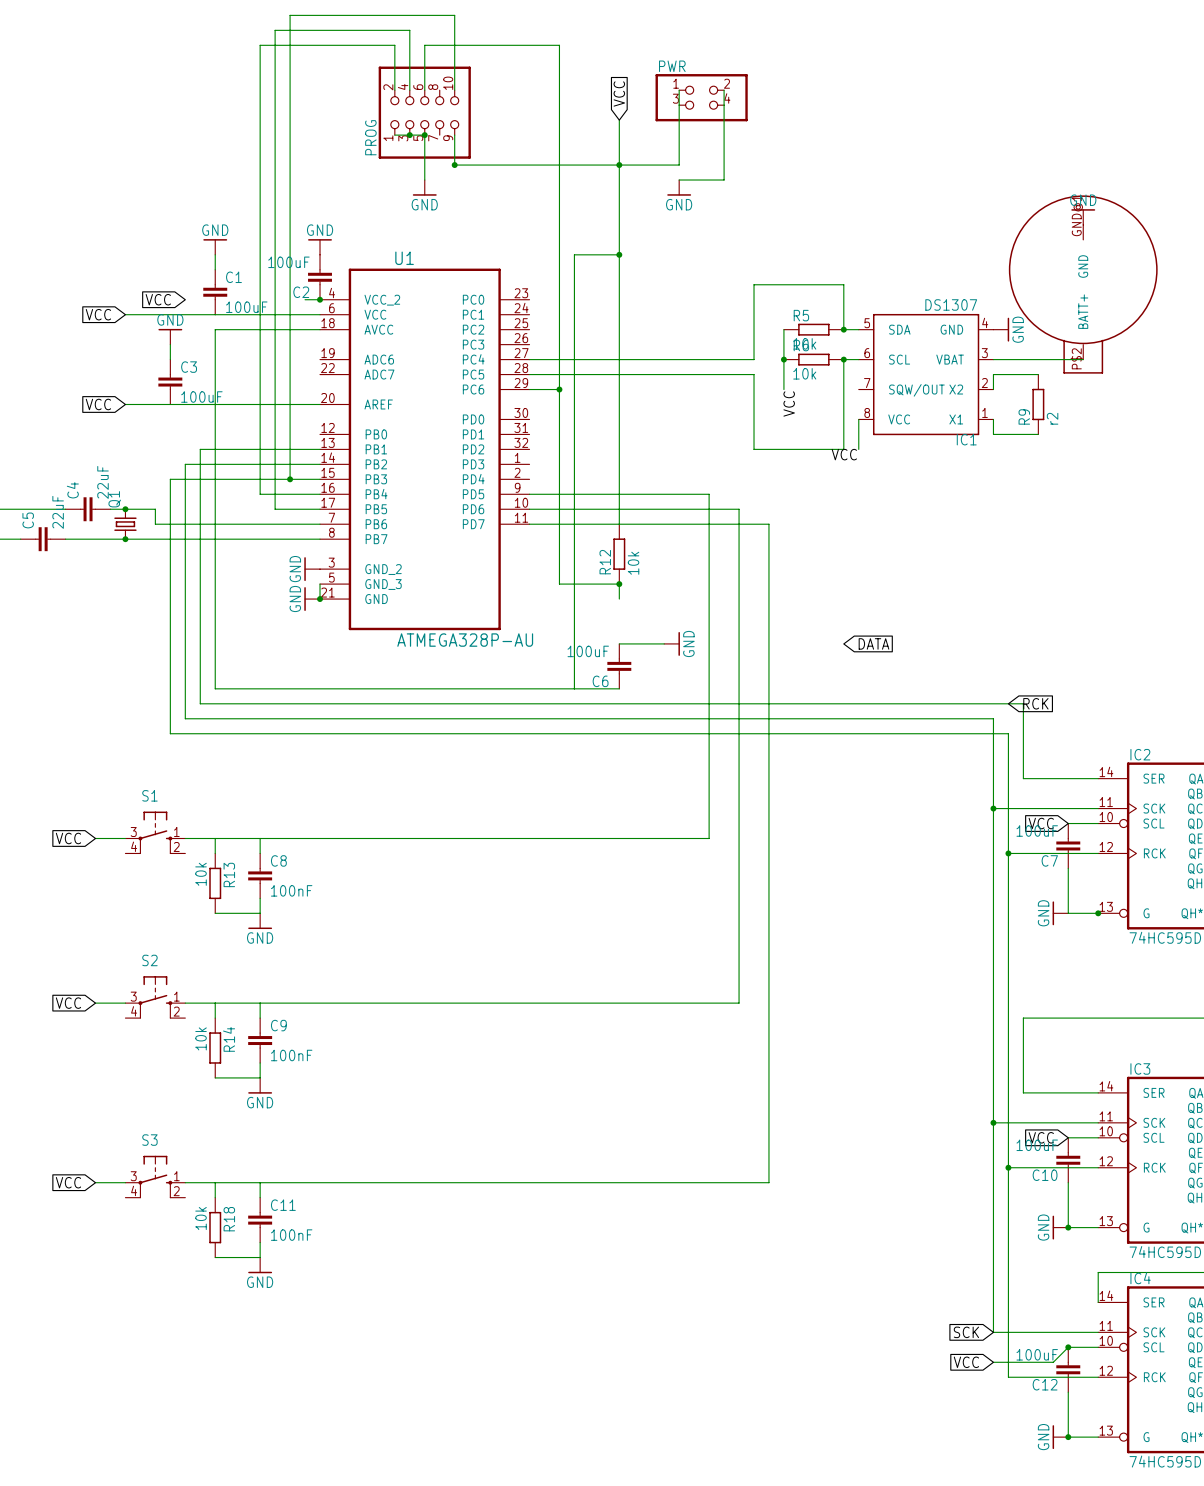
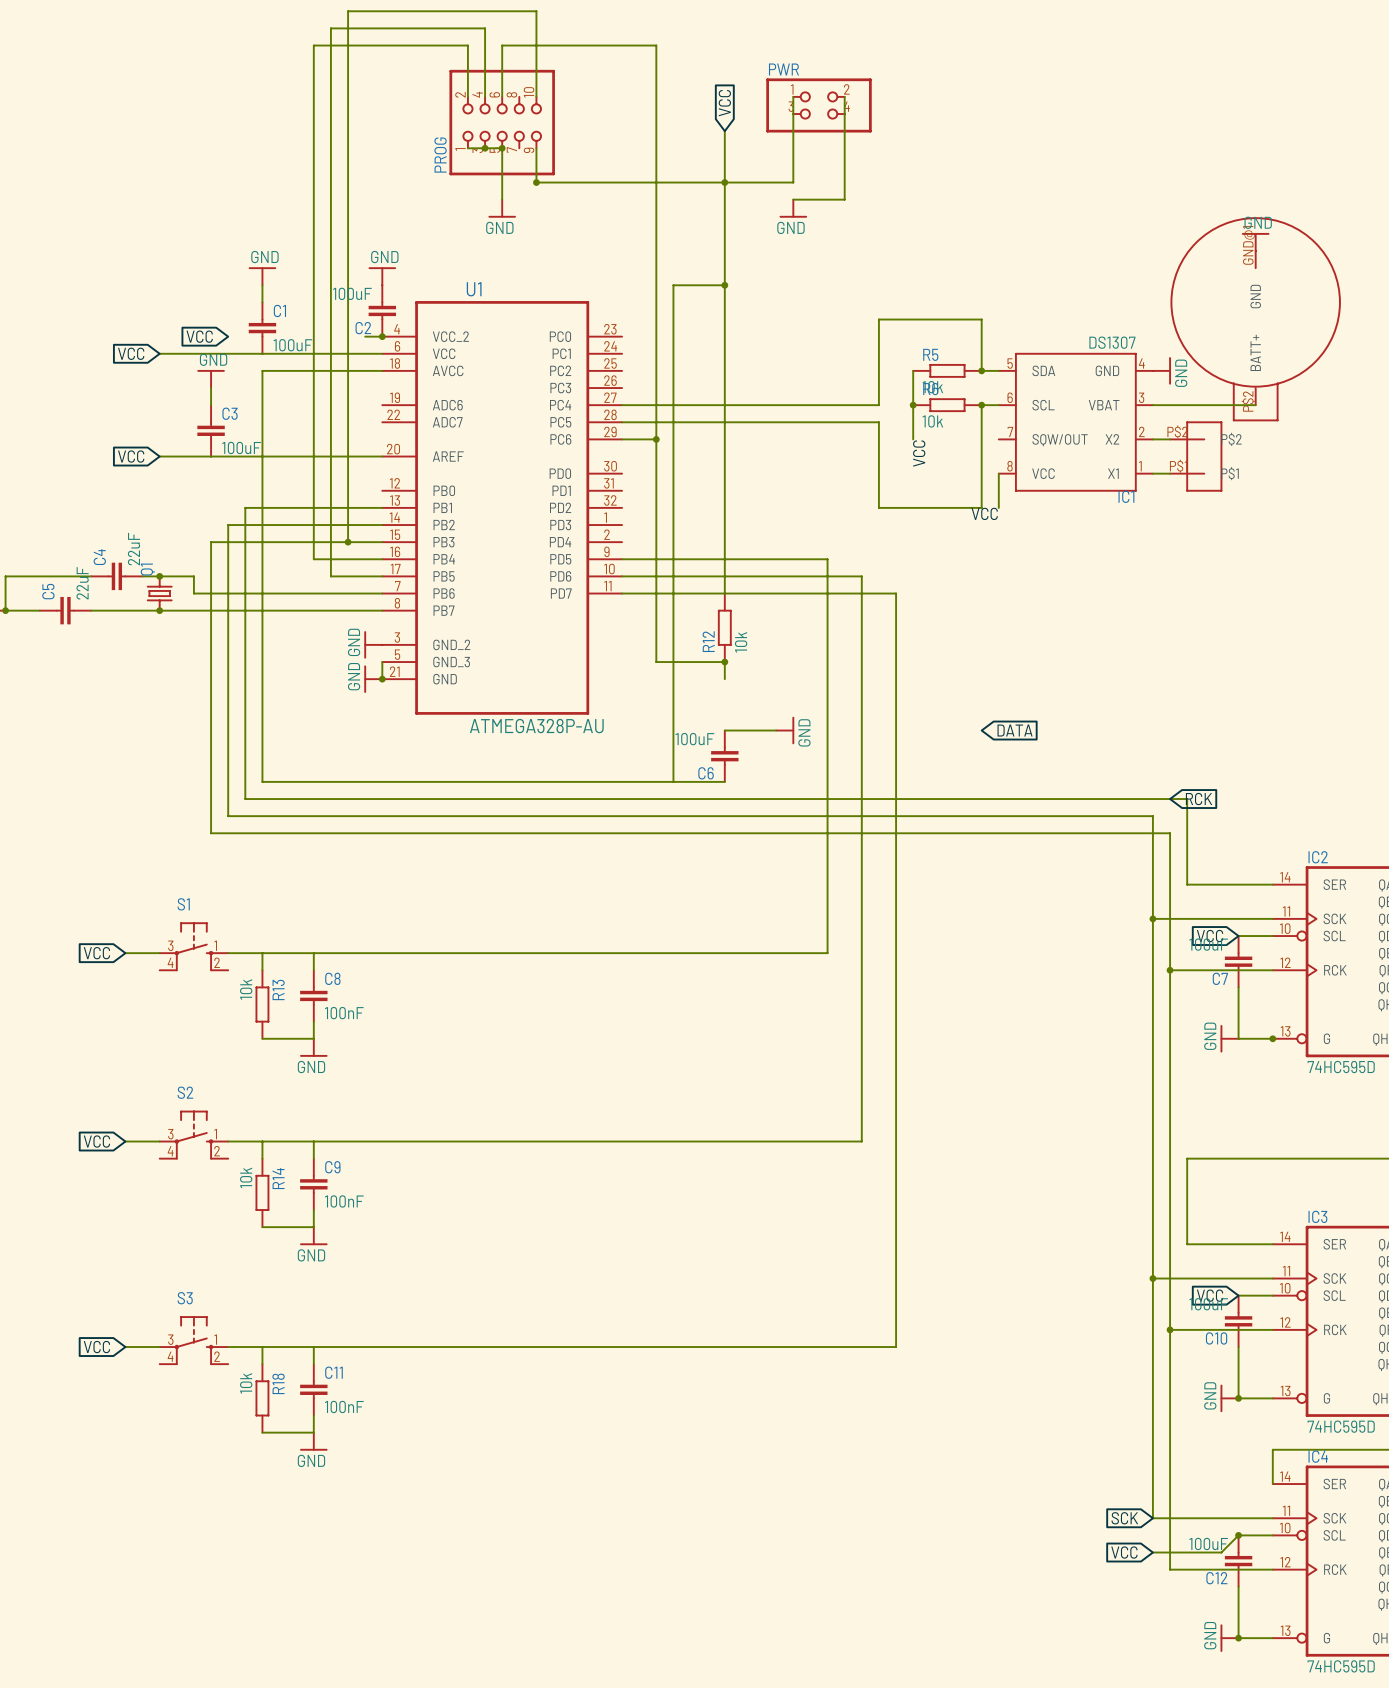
wire: (1038, 374) (993, 374) (993, 389) -> (1170, 439) (1152, 439)
part: none -> (1196, 456)
R9: r2 (1038, 404) -> none
wire: (993, 419) (993, 434) (1038, 434) -> (1152, 473) (1170, 473)

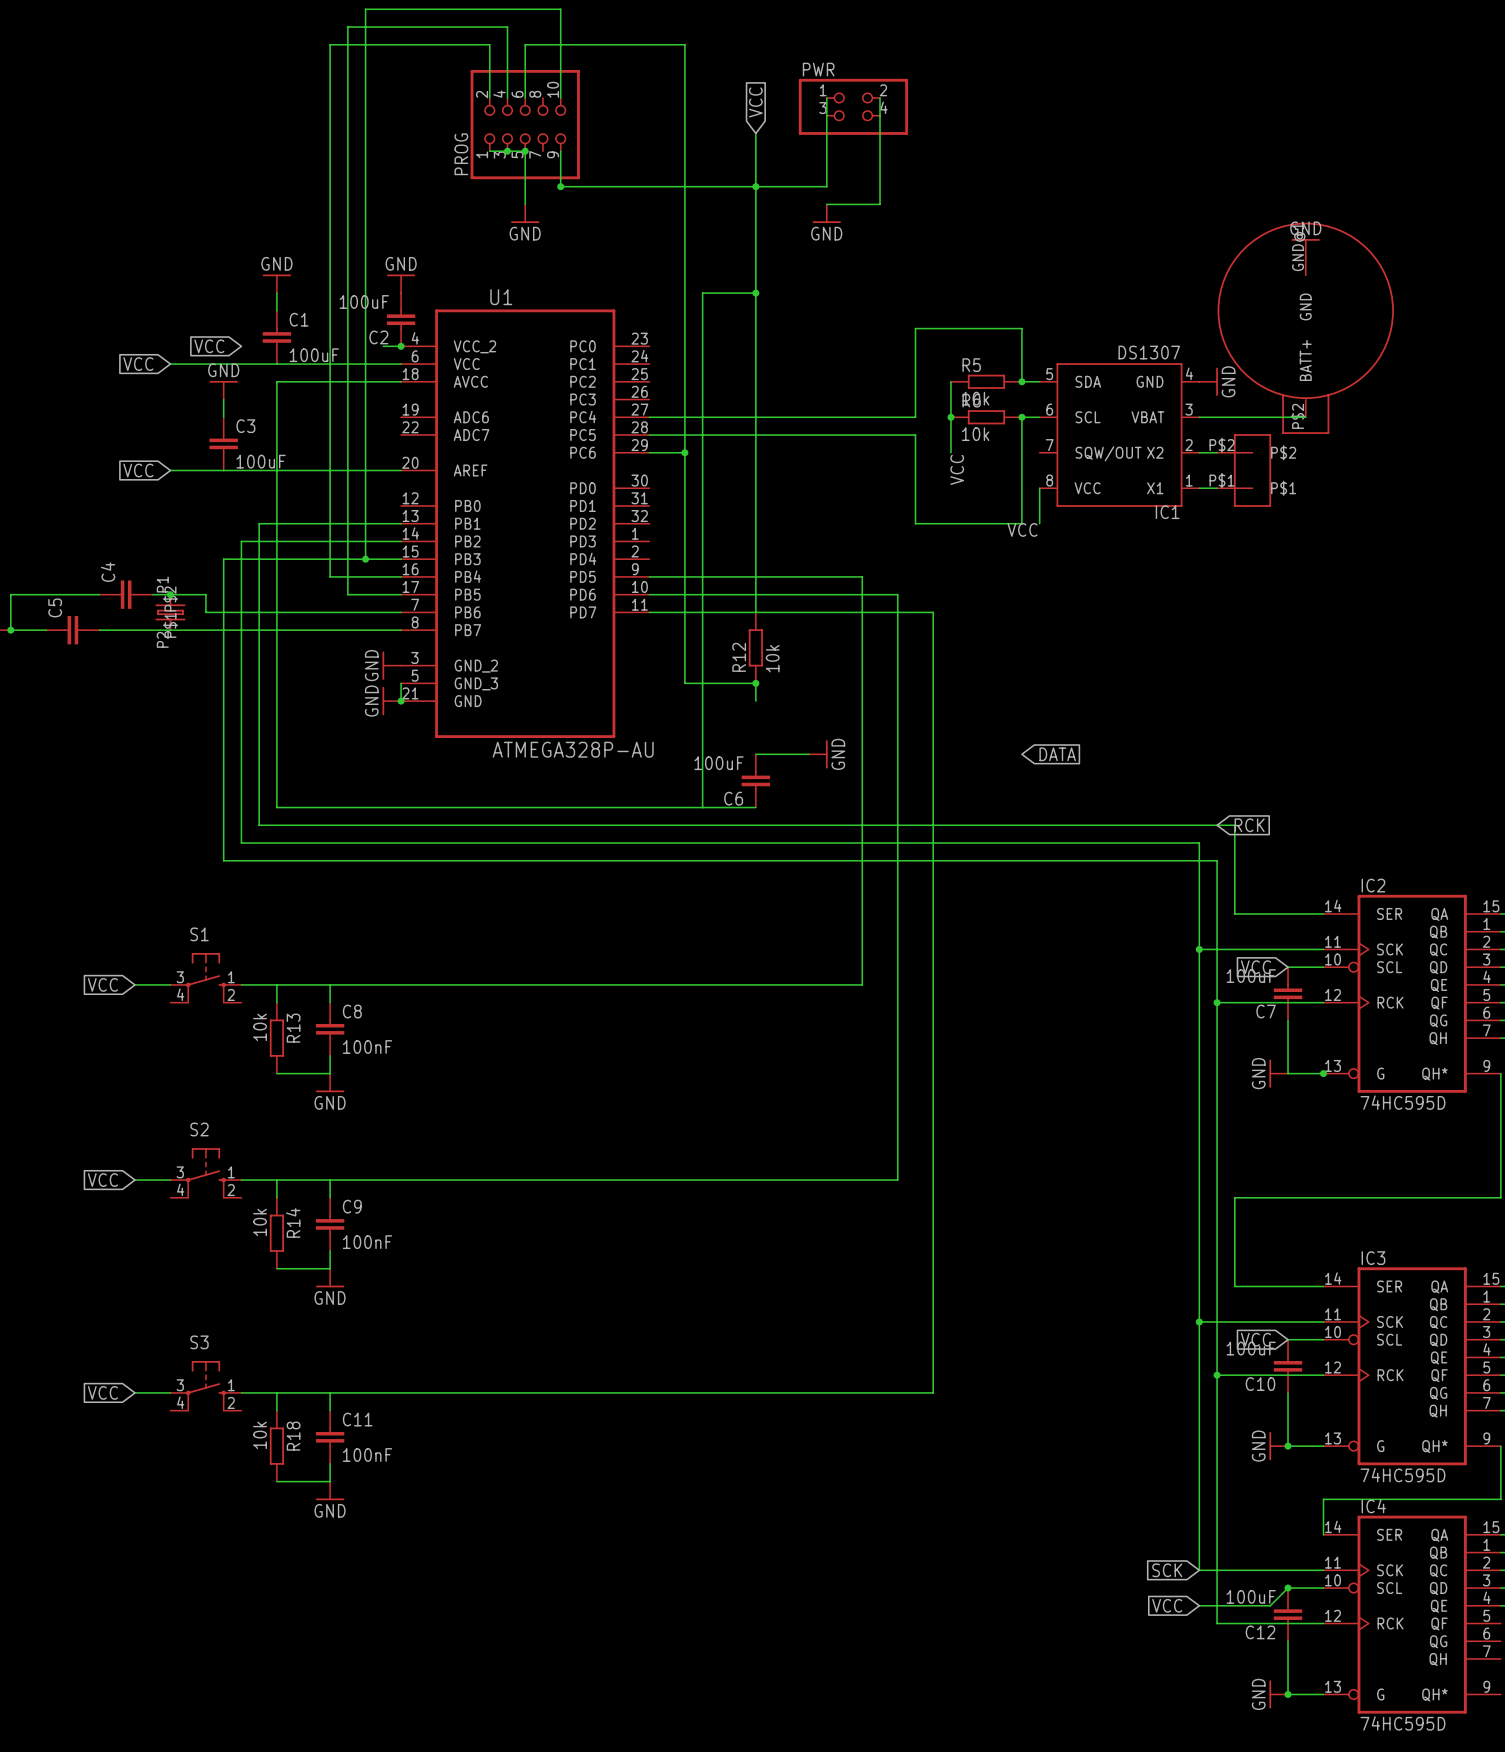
C4 value: 22uF (134, 549) -> none
C5 value: 22uF (82, 583) -> none
Q1: (159, 593) -> none
part: none -> (170, 612)
junction: (159, 610) -> none

